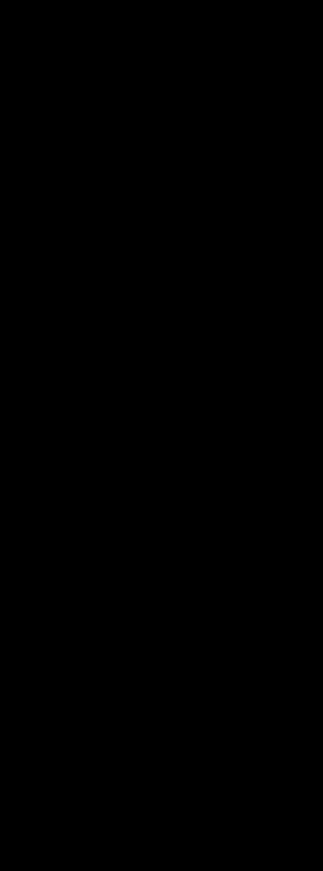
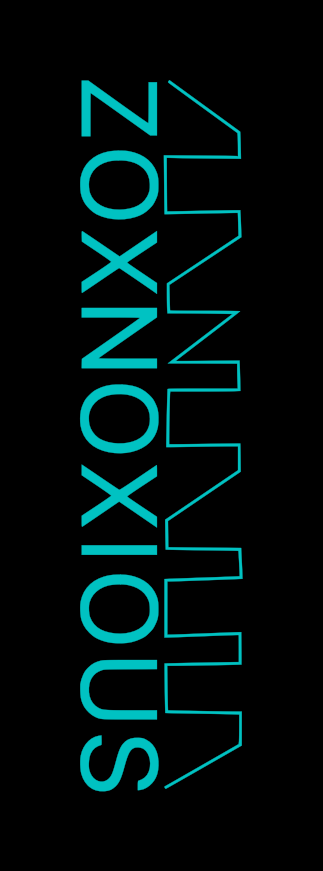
drawing: none -> [79, 79, 243, 792]

